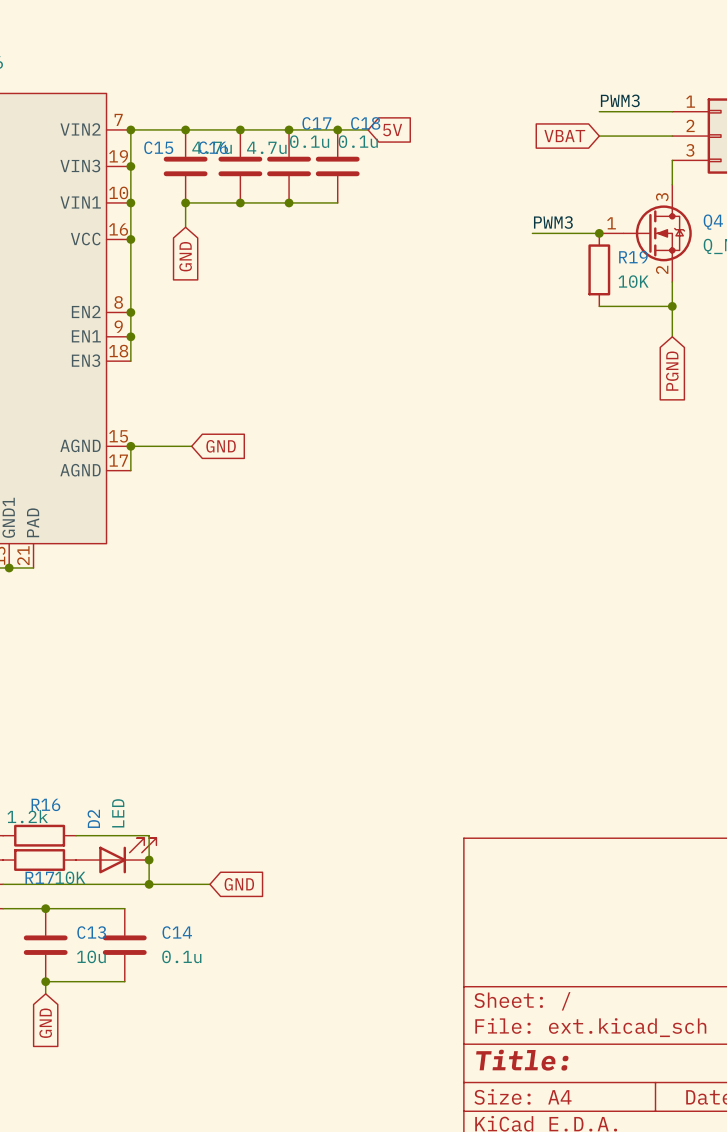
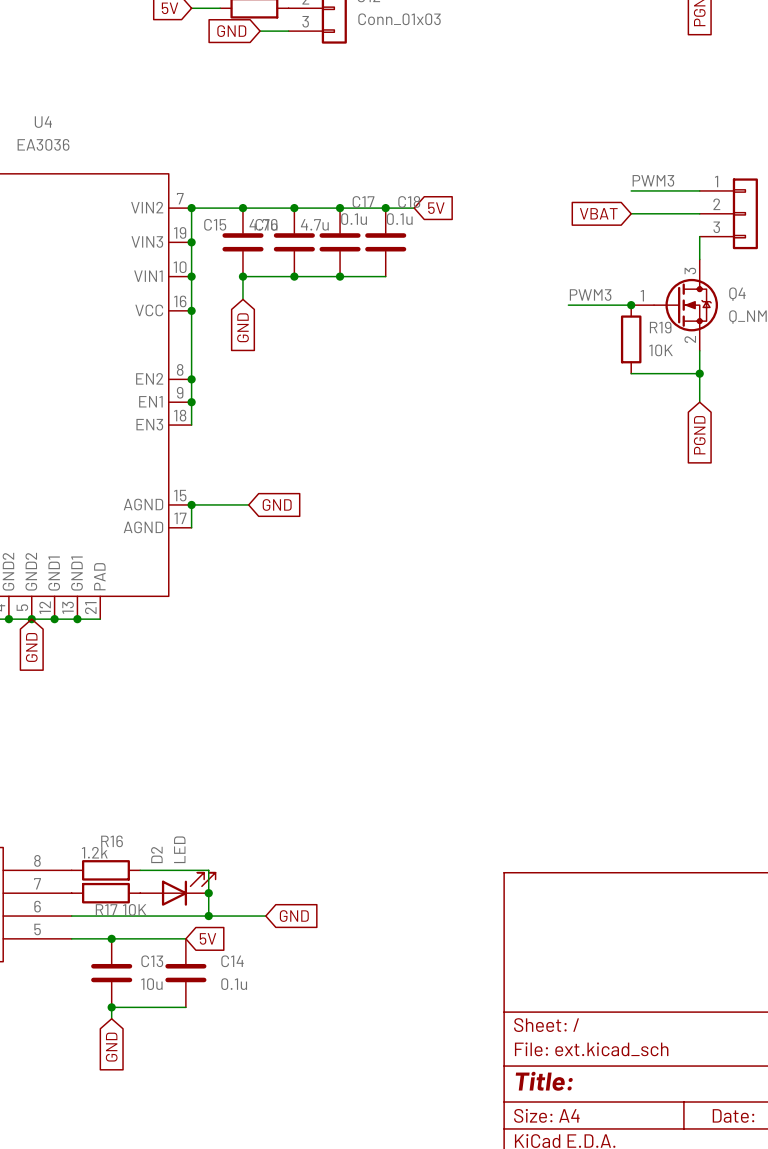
global label: none -> 5V (208, 938)

